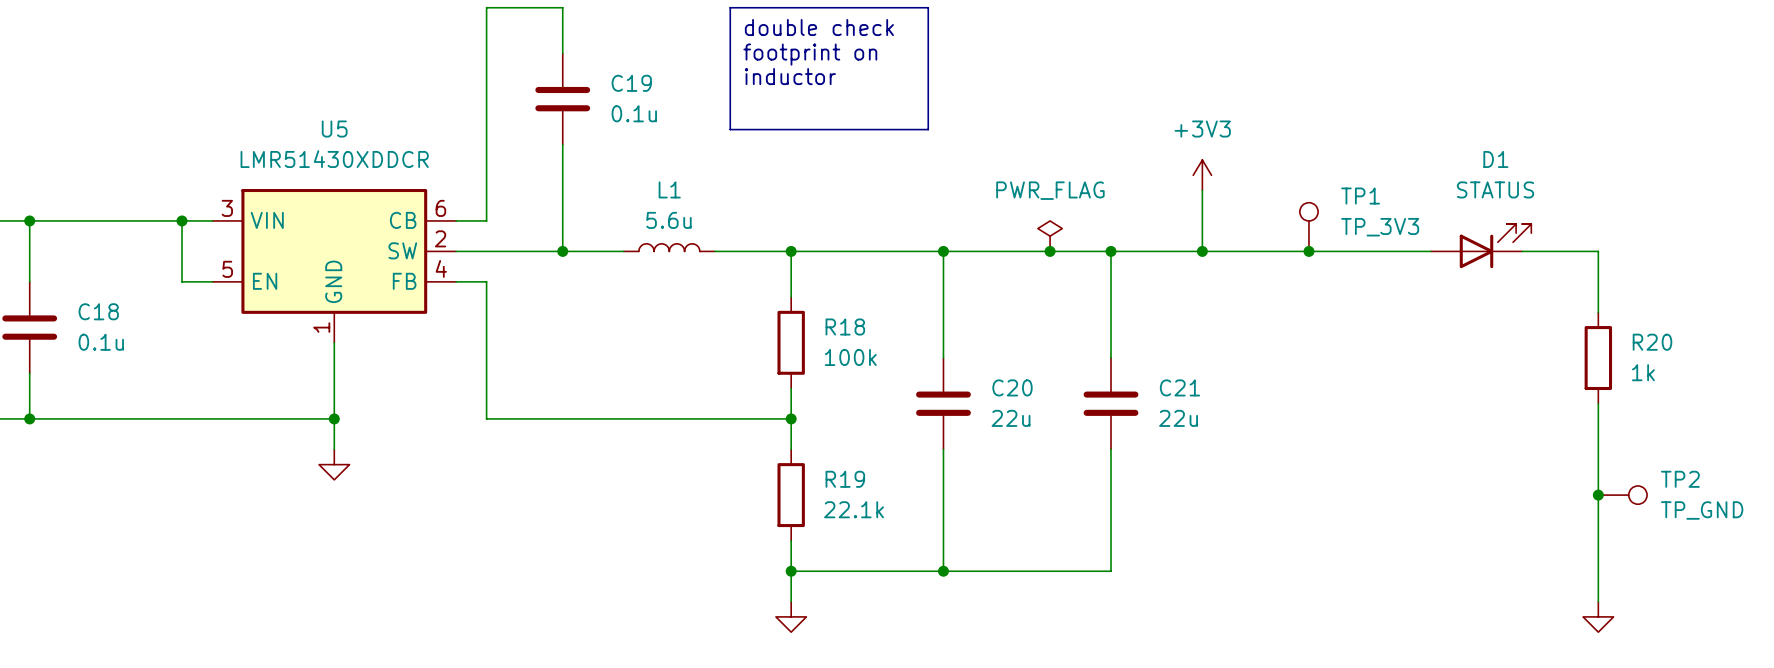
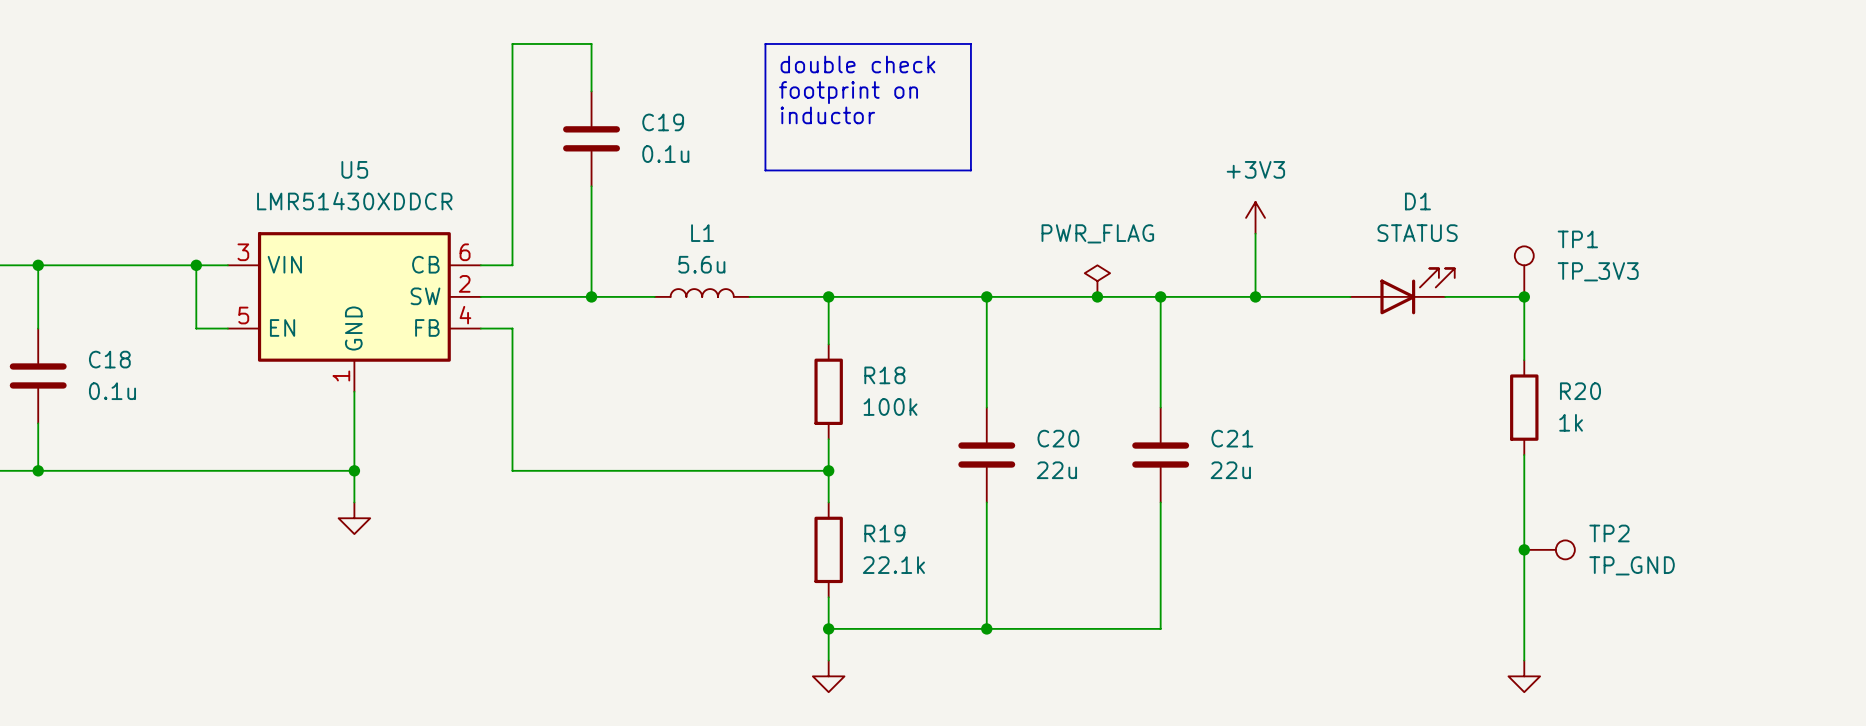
TP1 position: (1308, 227) -> (1524, 271)
D1 position: (1481, 246) -> (1402, 291)
junction: (1308, 251) -> none
wire: none -> (1492, 296) (1524, 296) (1524, 360)
junction: none -> (1524, 296)
wire: (1522, 251) (1598, 251) (1598, 312) -> none
R20 position: (1598, 358) -> (1524, 407)
wire: (1598, 403) (1598, 601) -> (1524, 455) (1524, 660)
junction: none -> (1524, 549)
junction: (1598, 495) -> none
TP2 position: (1622, 495) -> (1549, 549)
power symbol position: (1598, 616) -> (1524, 676)

